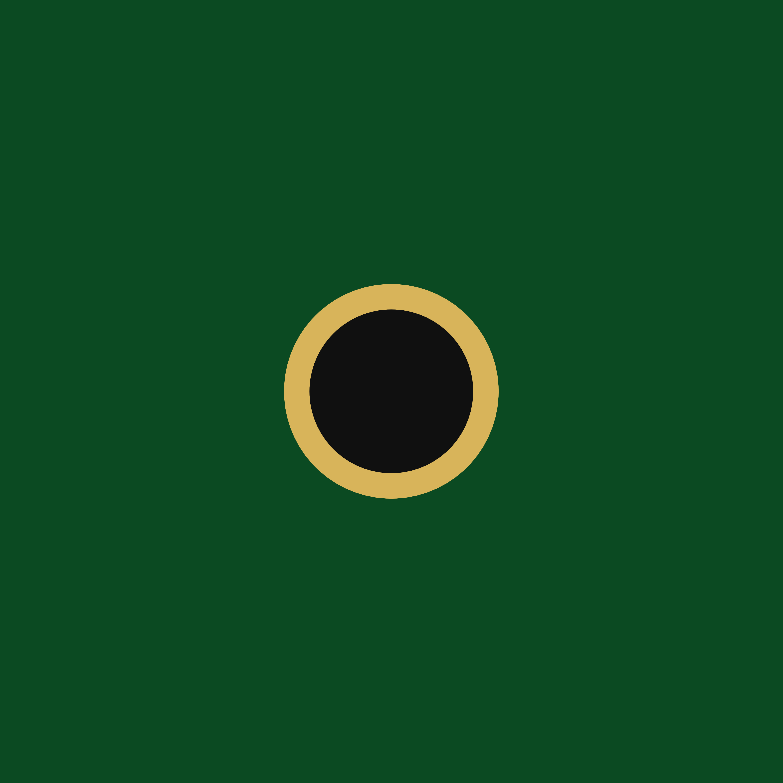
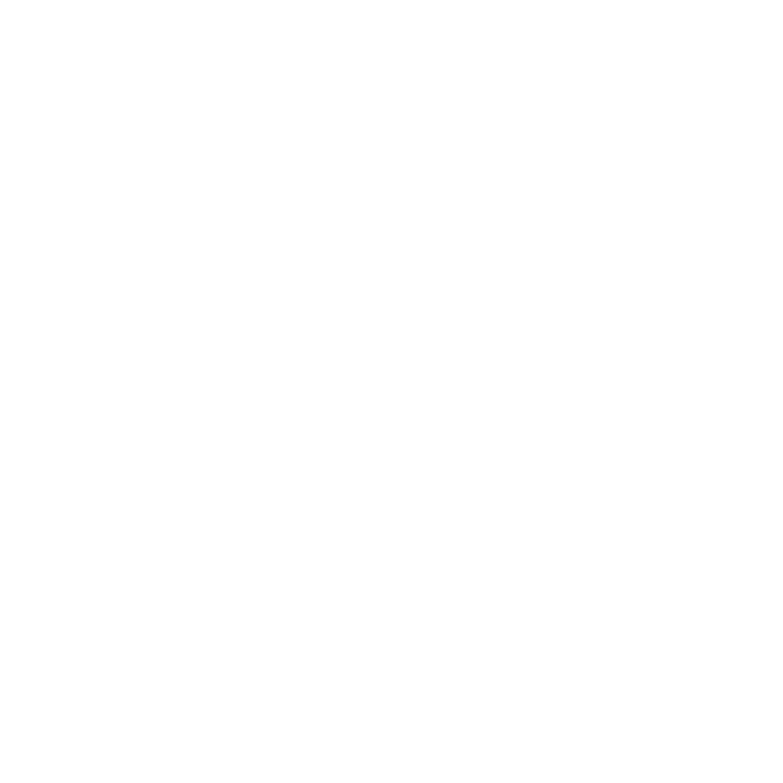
part: (391, 391) -> none

